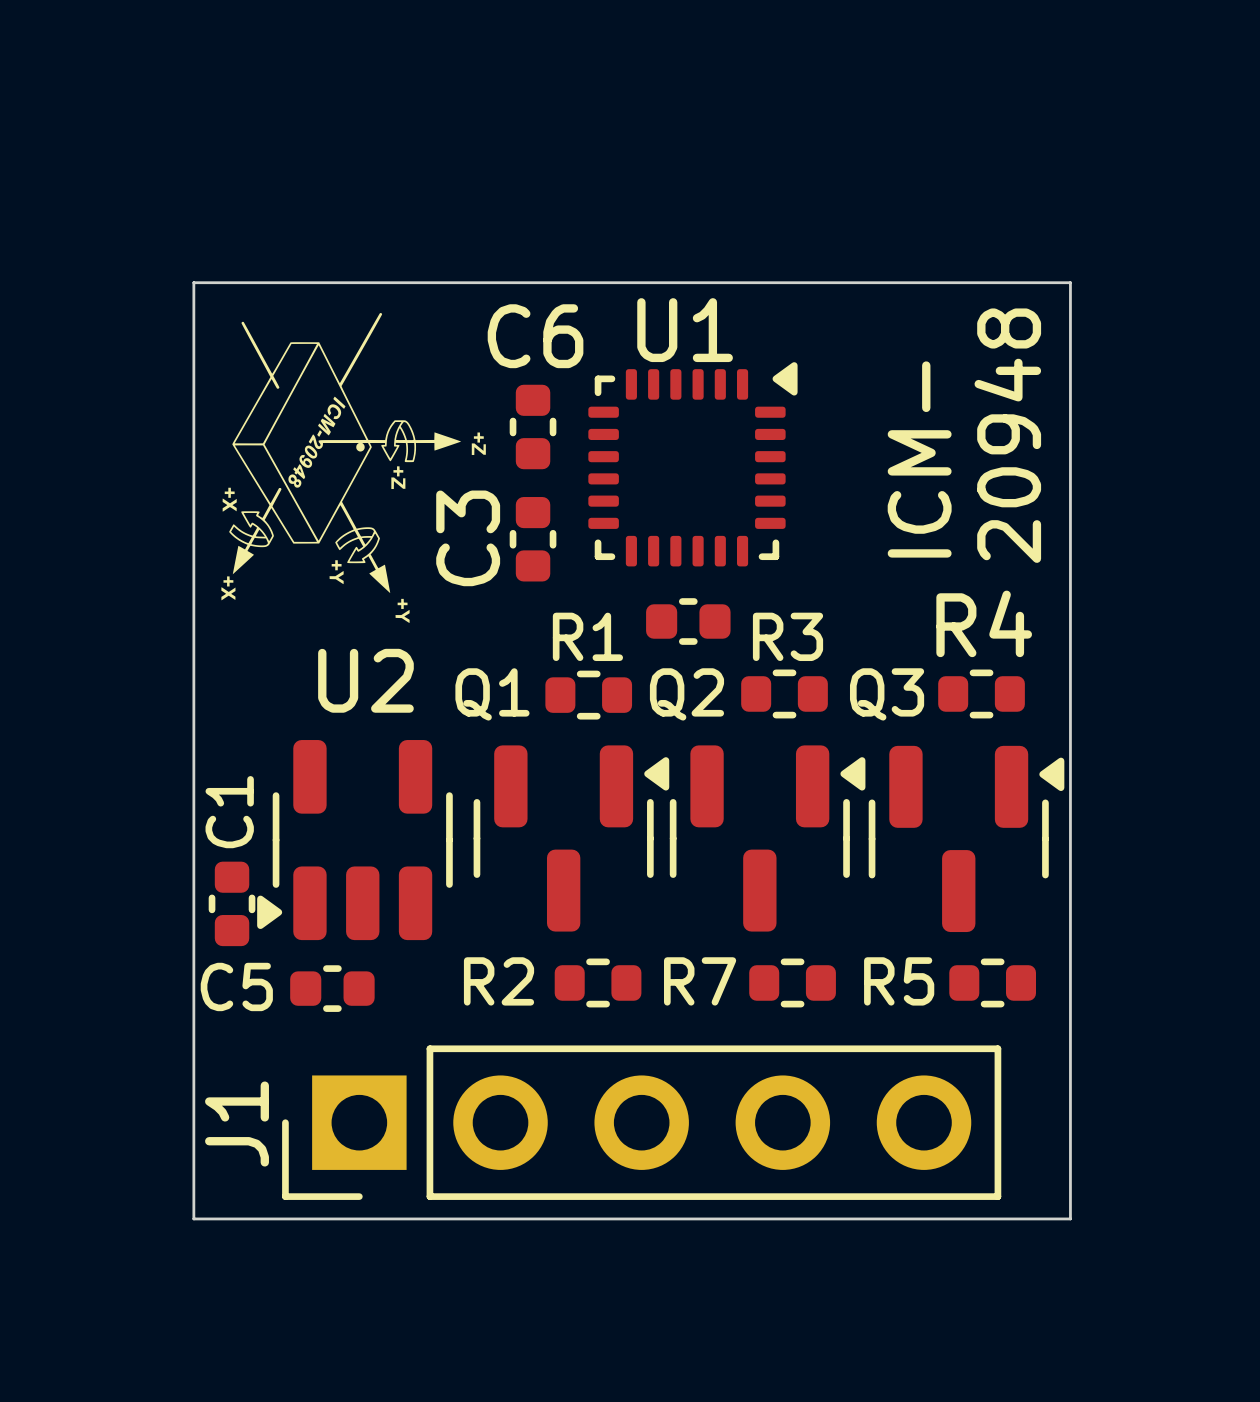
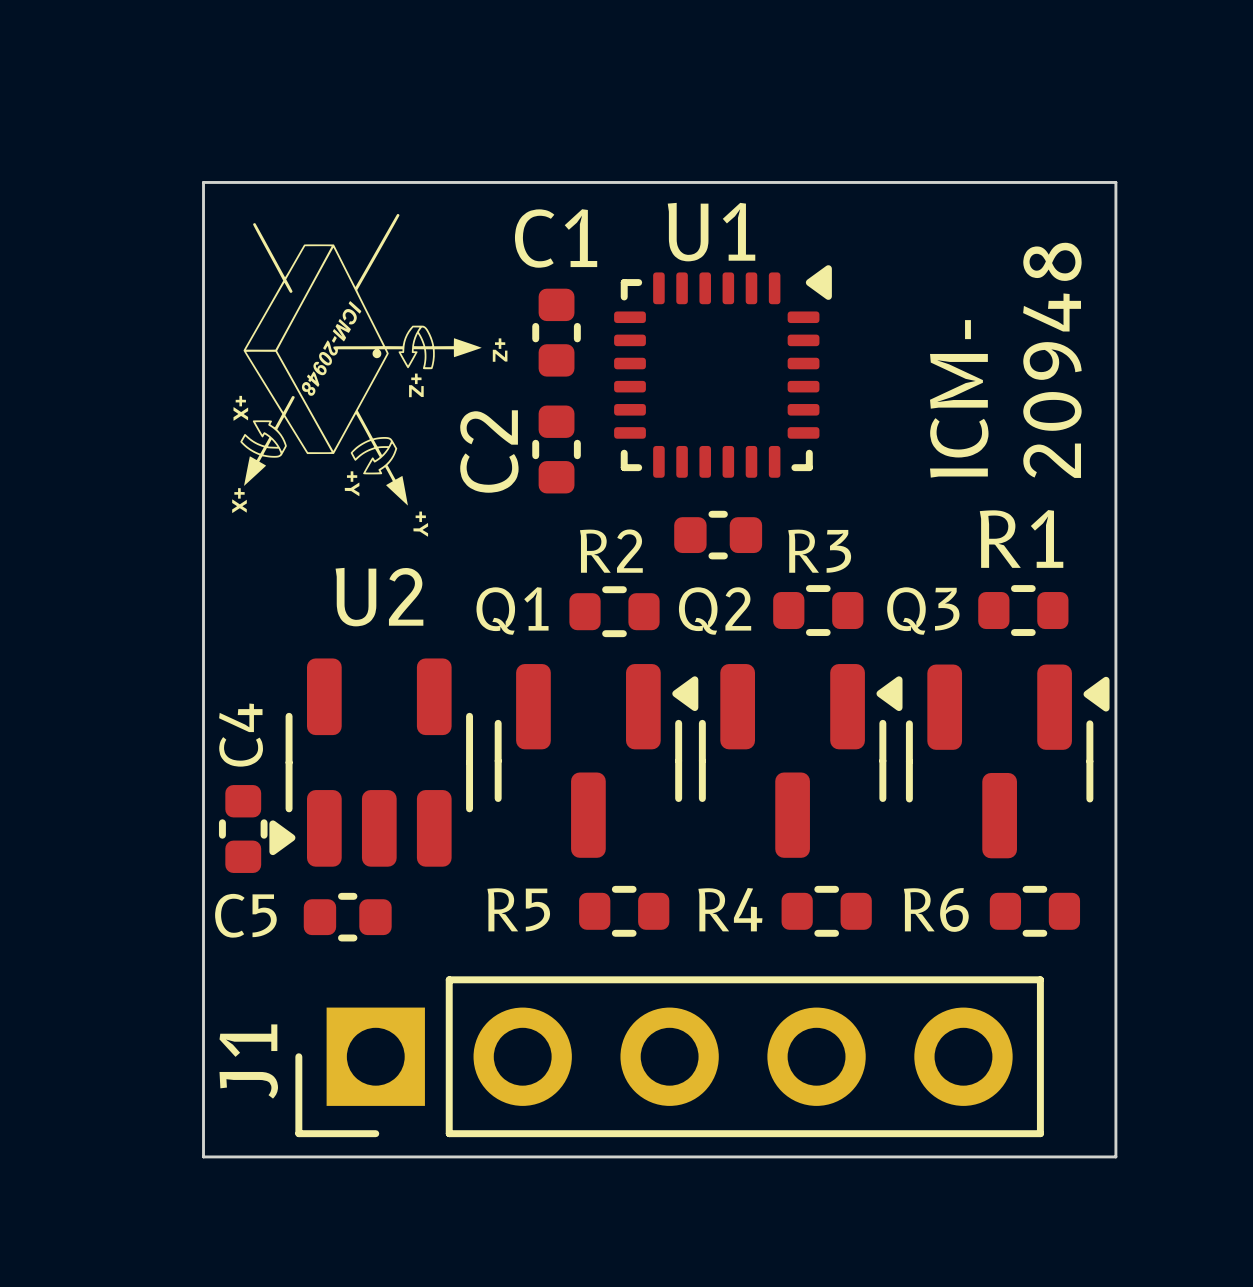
C6 name: C6 (535, 336) -> C1 (556, 238)
C3 name: C3 (468, 538) -> C2 (489, 451)
R4 name: R4 (984, 623) -> R1 (1021, 538)
R1 name: R1 (587, 636) -> R2 (611, 551)
C1 name: C1 (229, 812) -> C4 (241, 735)
R2 name: R2 (499, 981) -> R5 (518, 909)
R7 name: R7 (700, 981) -> R4 (730, 909)
R5 name: R5 (899, 981) -> R6 (936, 909)

